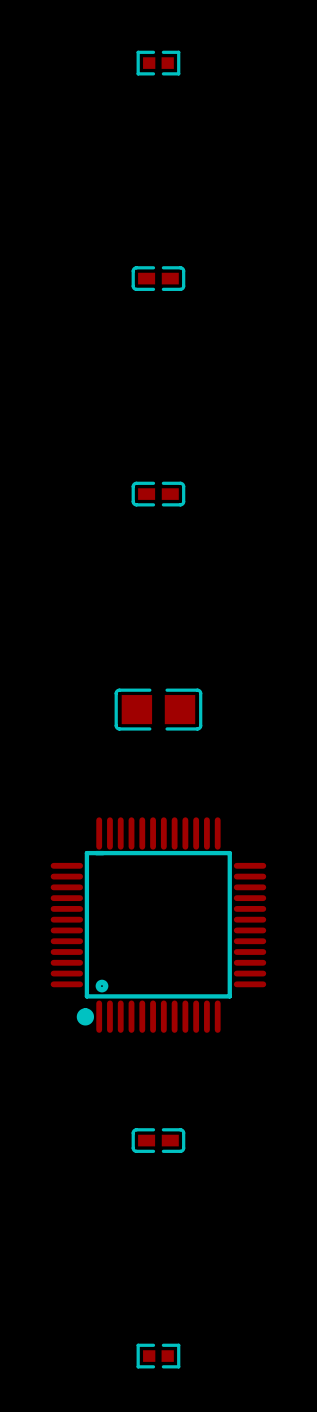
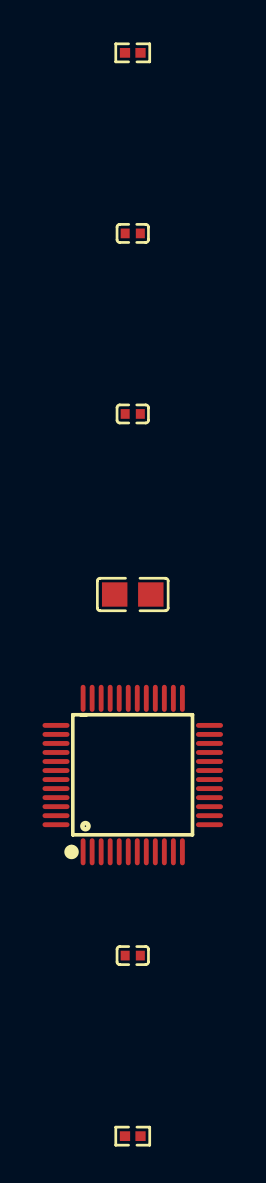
part footprint: [131, 266, 186, 291] -> [115, 223, 150, 244]
part footprint: [131, 481, 186, 507] -> [115, 403, 150, 425]
part footprint: [131, 1128, 186, 1153] -> [115, 945, 150, 966]

